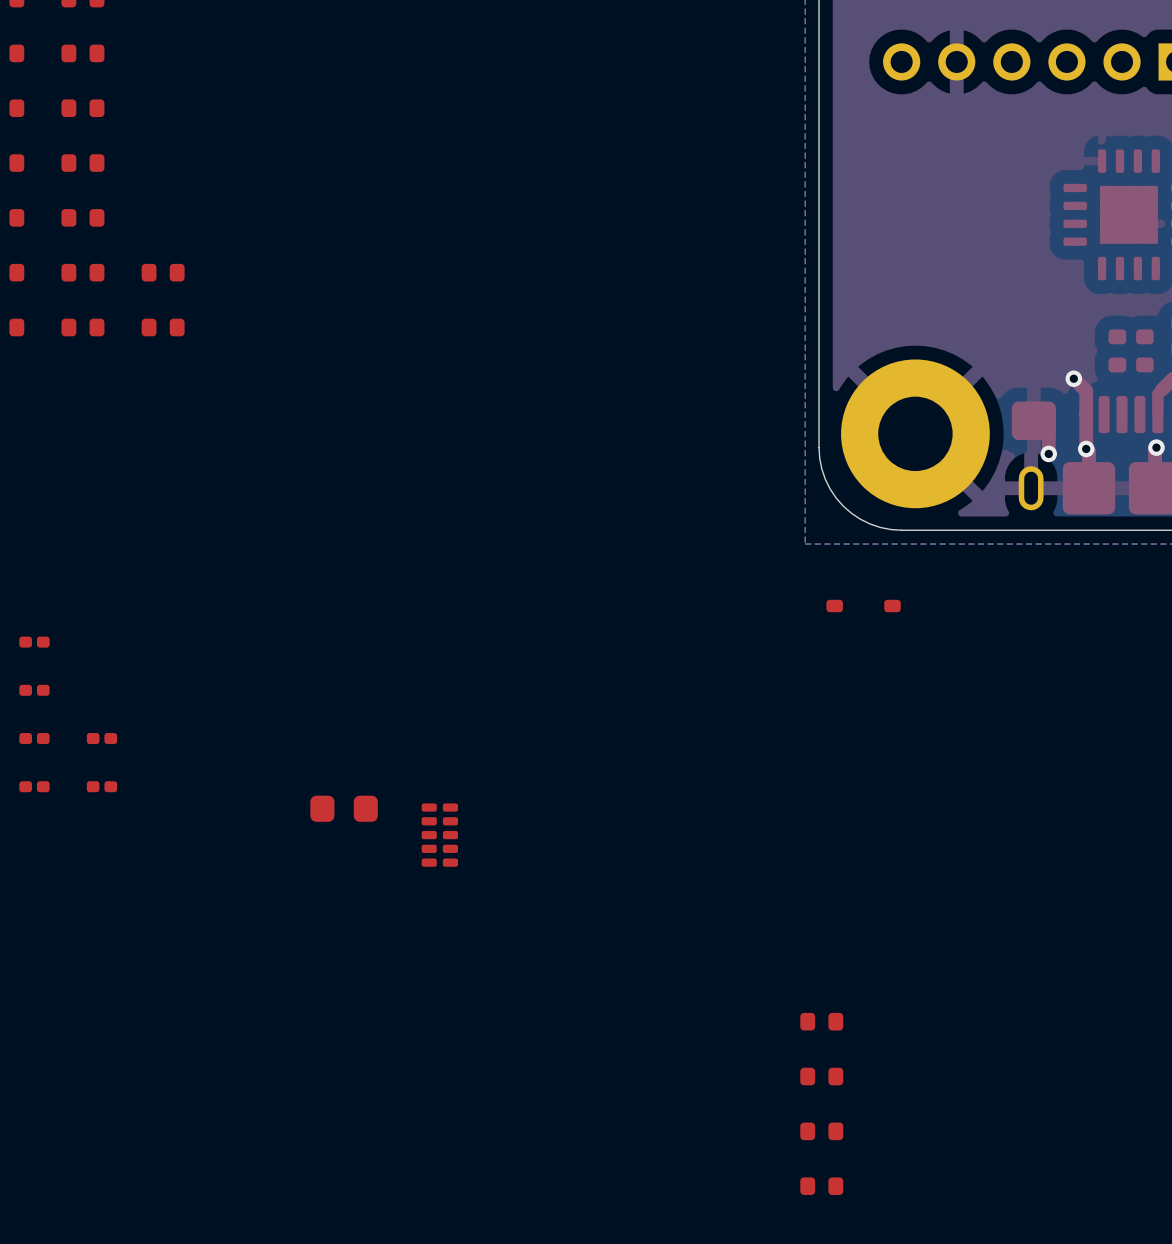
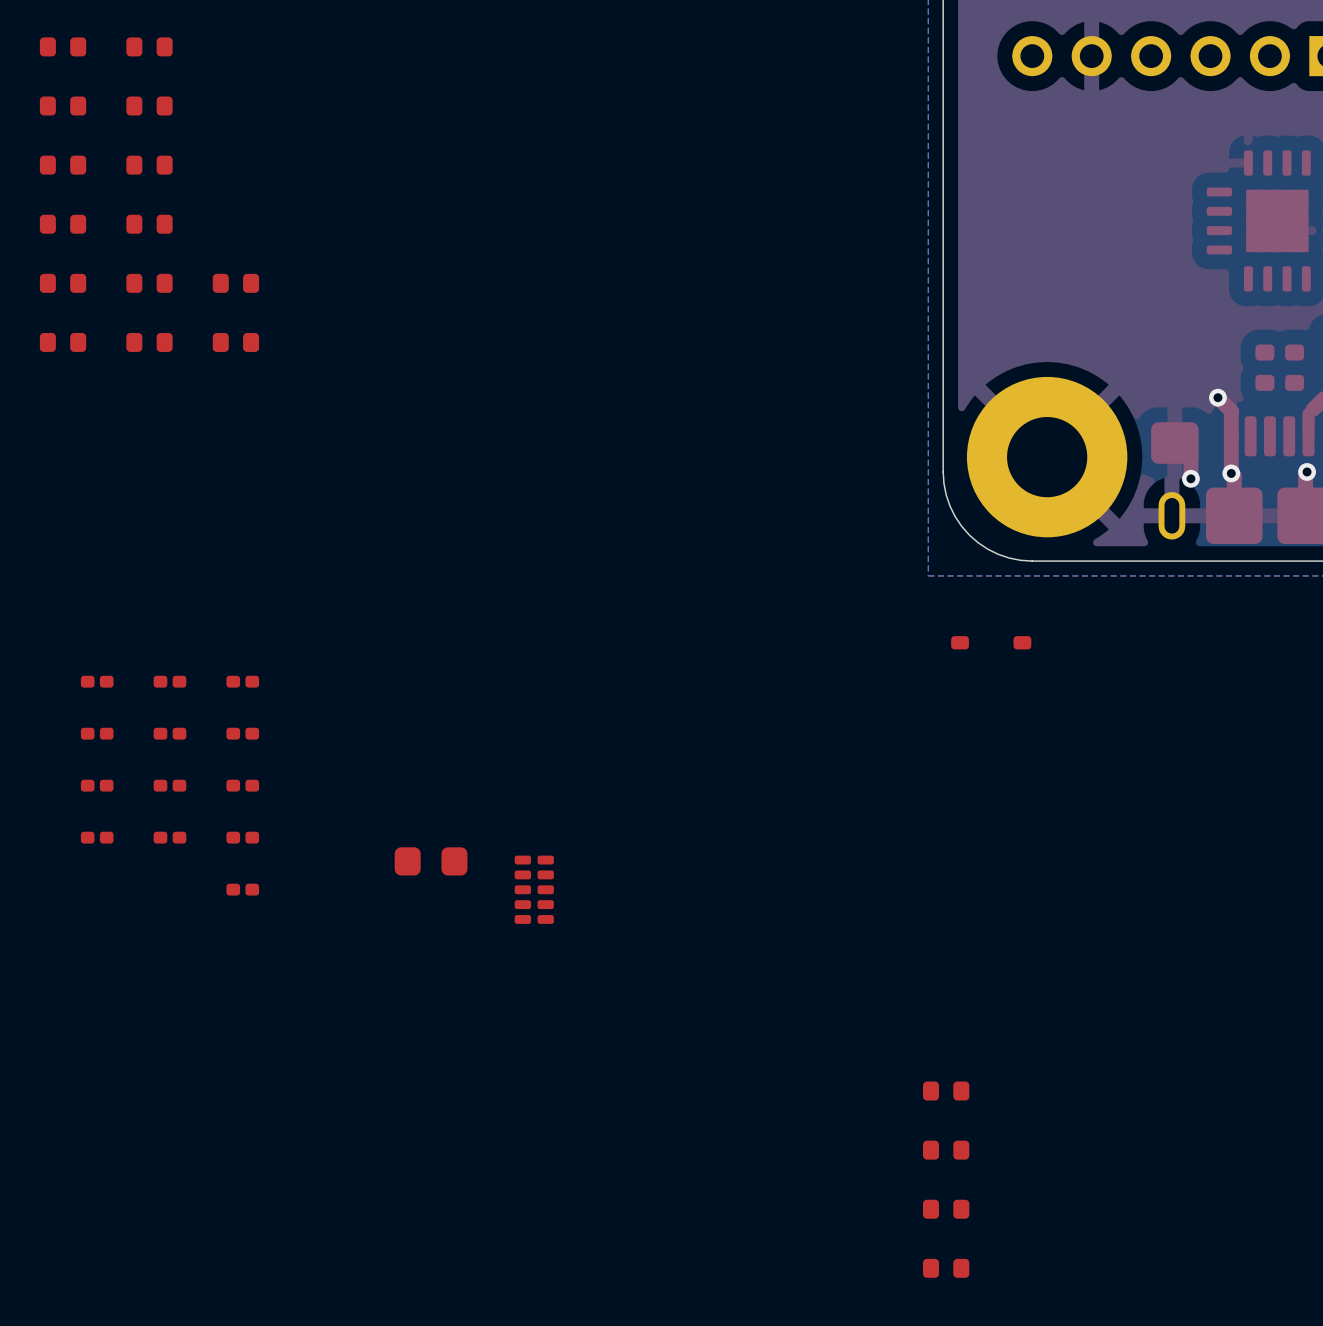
part: none -> (169, 681)
part: none -> (242, 681)
part: none -> (169, 733)
part: none -> (242, 733)
part: none -> (242, 785)
part: none -> (242, 837)
part: none -> (242, 889)

